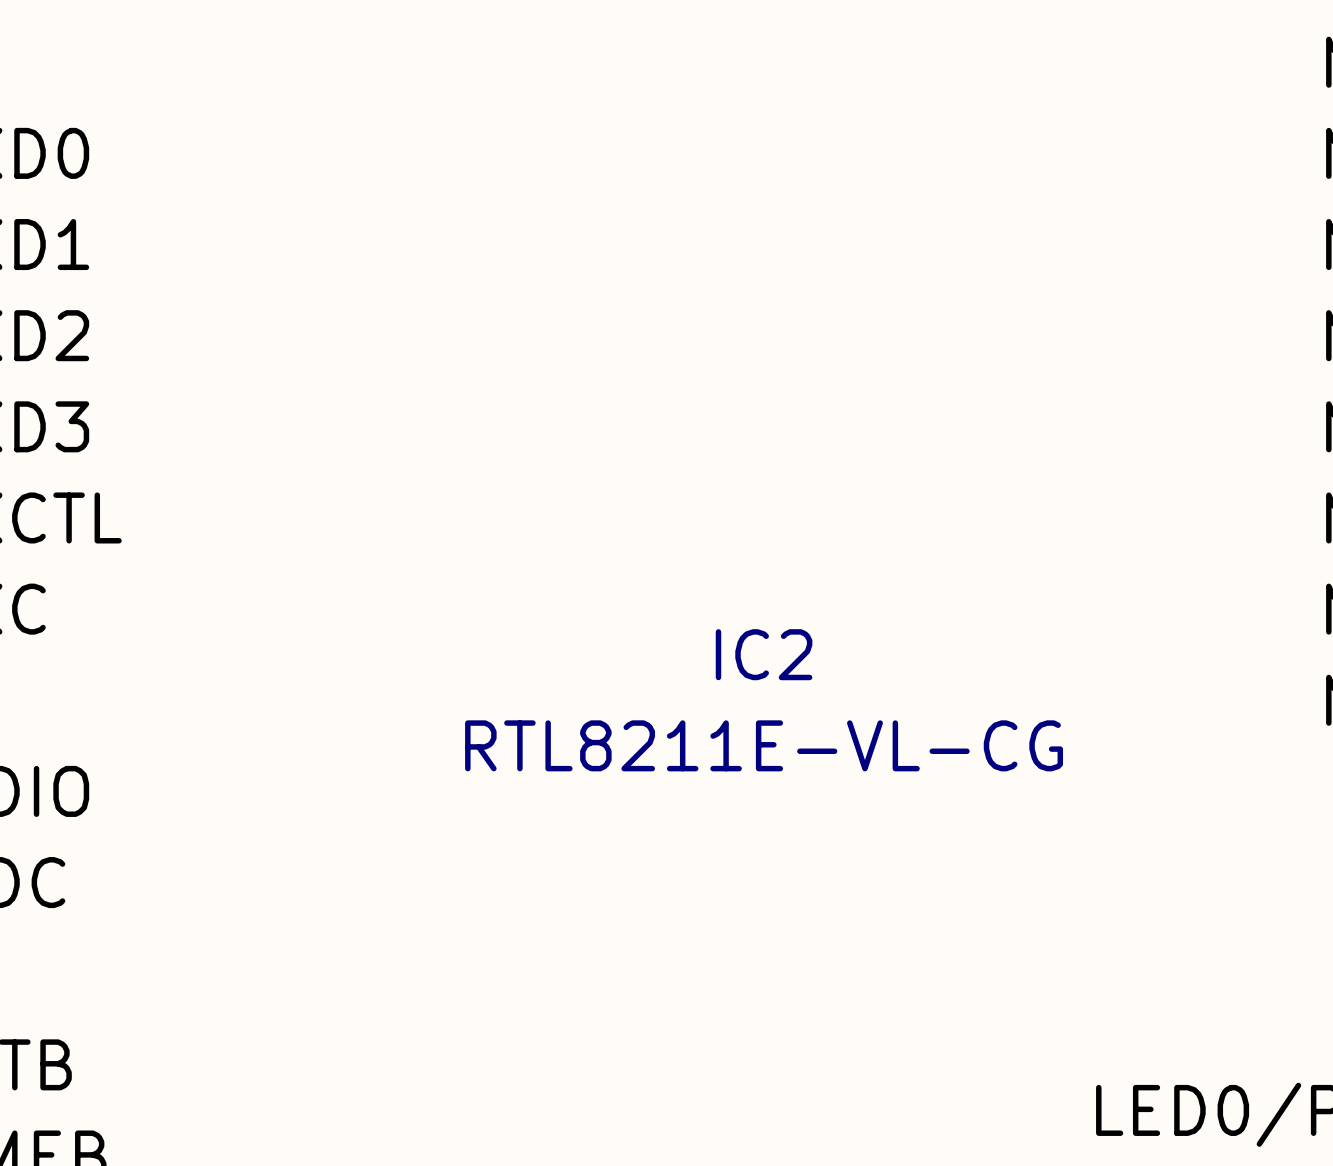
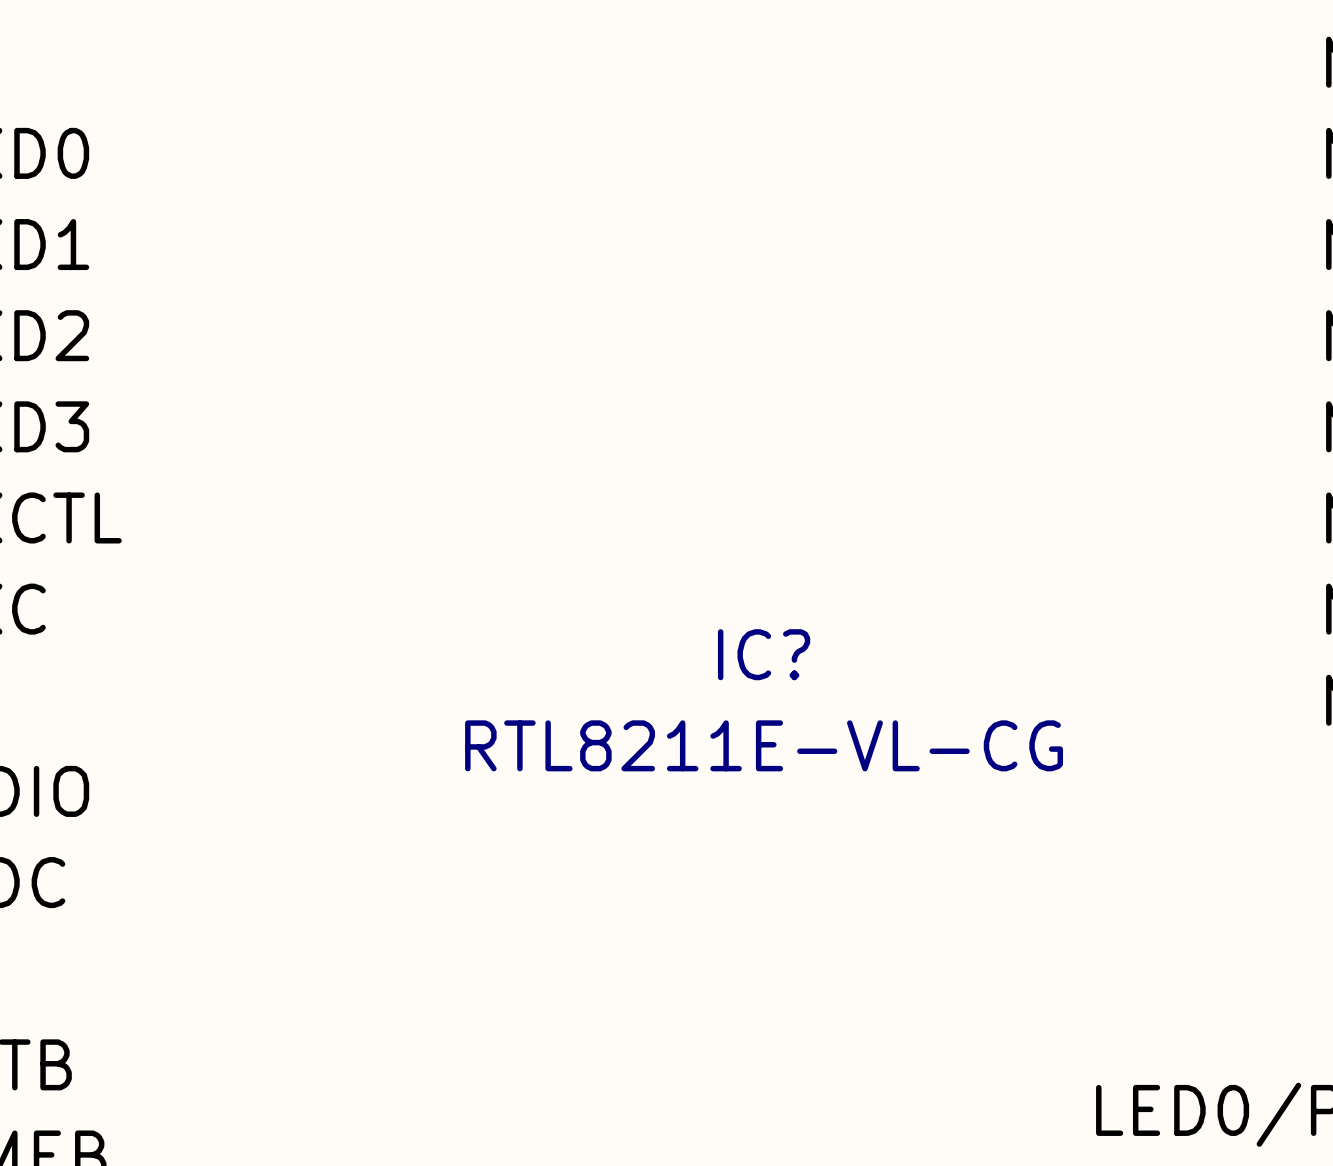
IC2 name: IC2 (764, 654) -> IC? (764, 654)

